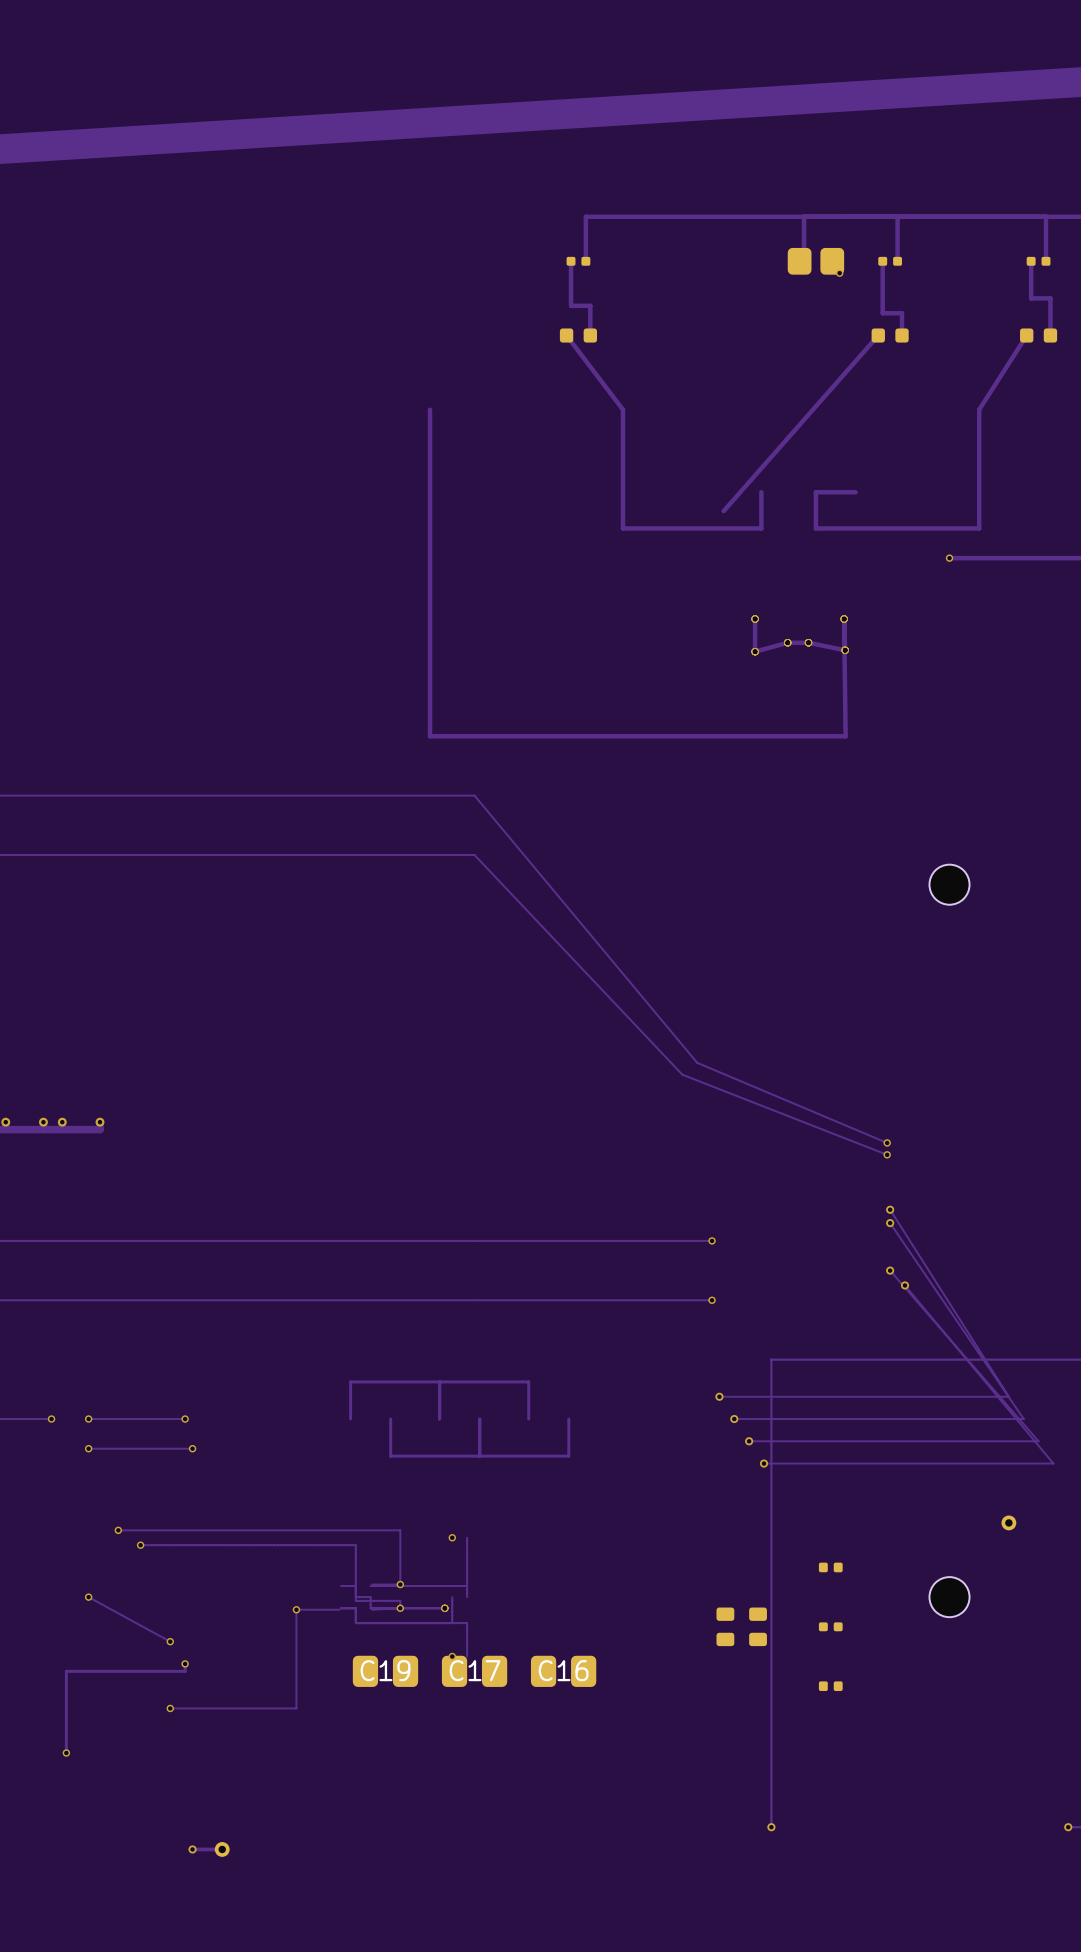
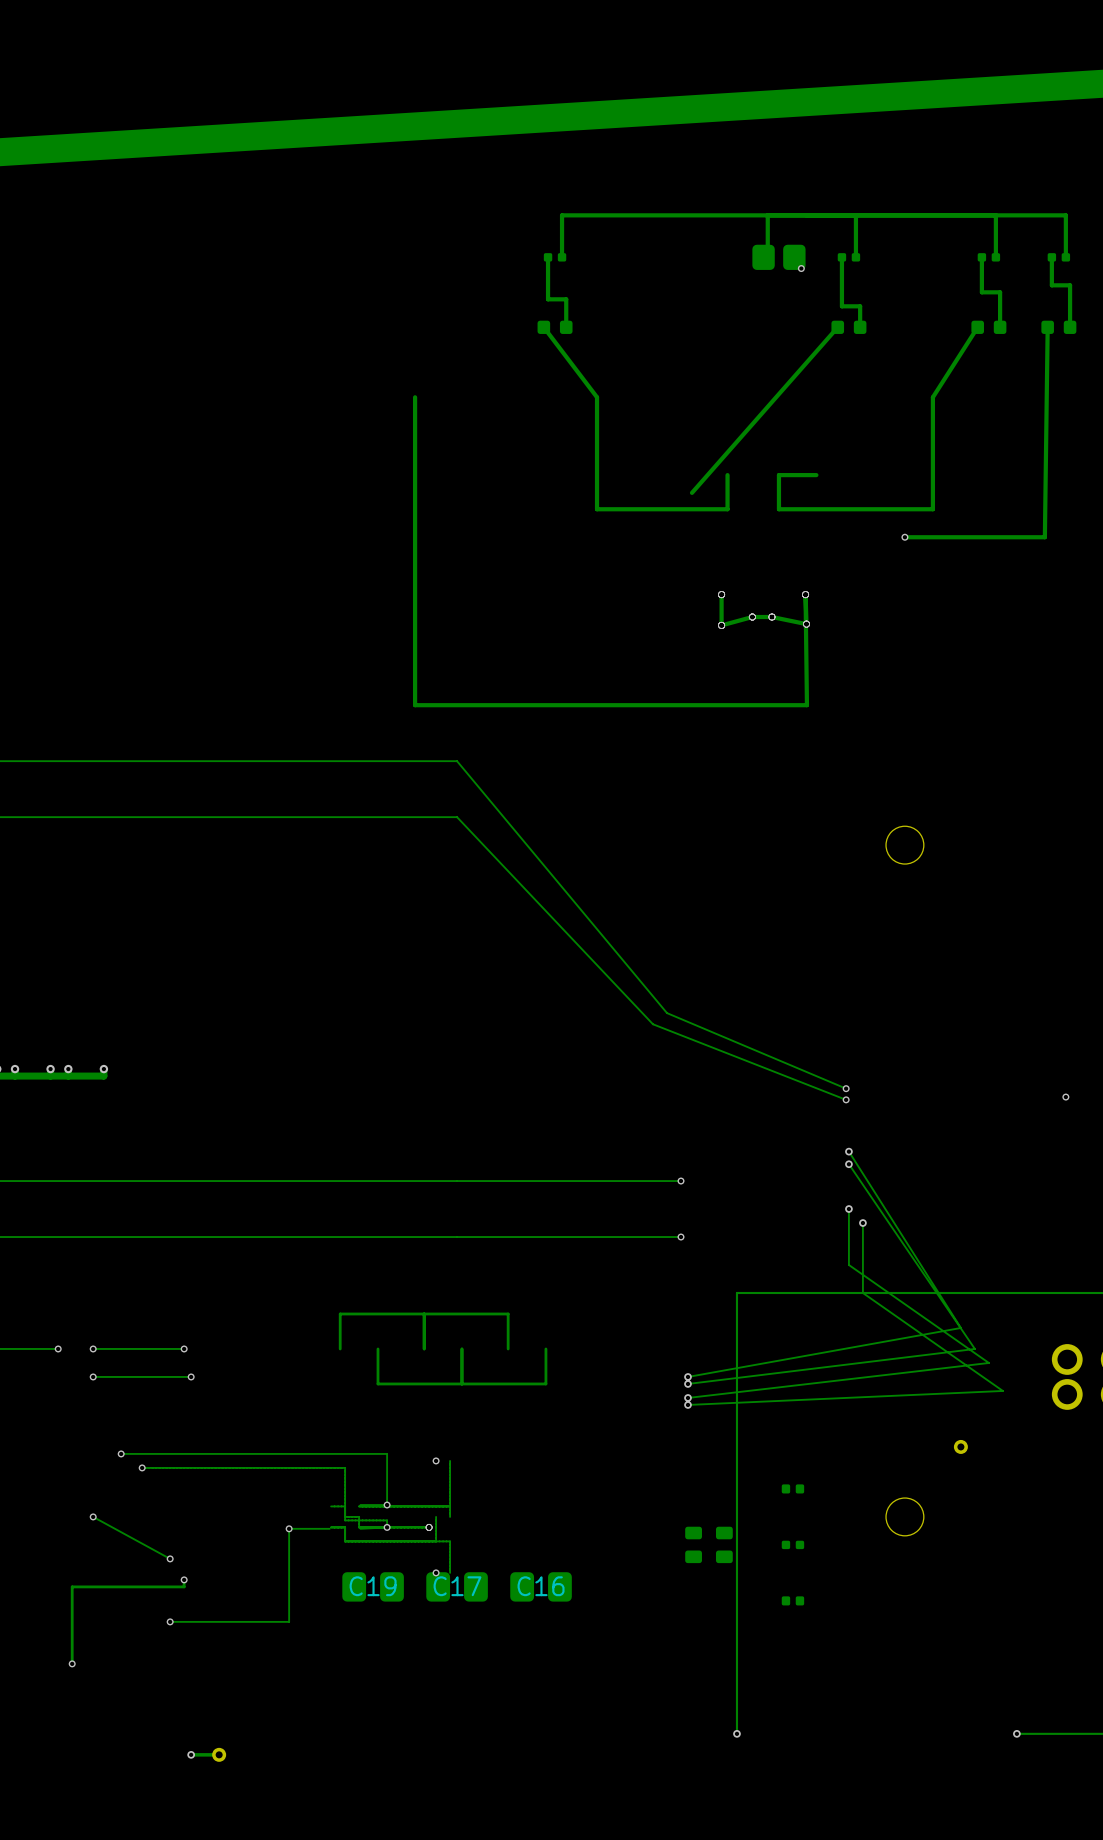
track: (890, 1270) (1038, 1441) (749, 1441) -> (848, 1209) (848, 1265) (988, 1362) (687, 1397)
track: (904, 1285) (1053, 1463) (763, 1463) -> (862, 1223) (862, 1292) (1002, 1390) (687, 1404)
via: (719, 1396) -> none
track: (1008, 1396) (719, 1396) -> (960, 1327) (687, 1376)
via: (734, 1419) -> none
track: (1023, 1419) (734, 1419) -> (974, 1348) (687, 1383)
via: (749, 1441) -> none
via: none -> (687, 1376)
via: none -> (687, 1383)
via: (763, 1463) -> none
via: none -> (687, 1397)
via: none -> (687, 1404)

